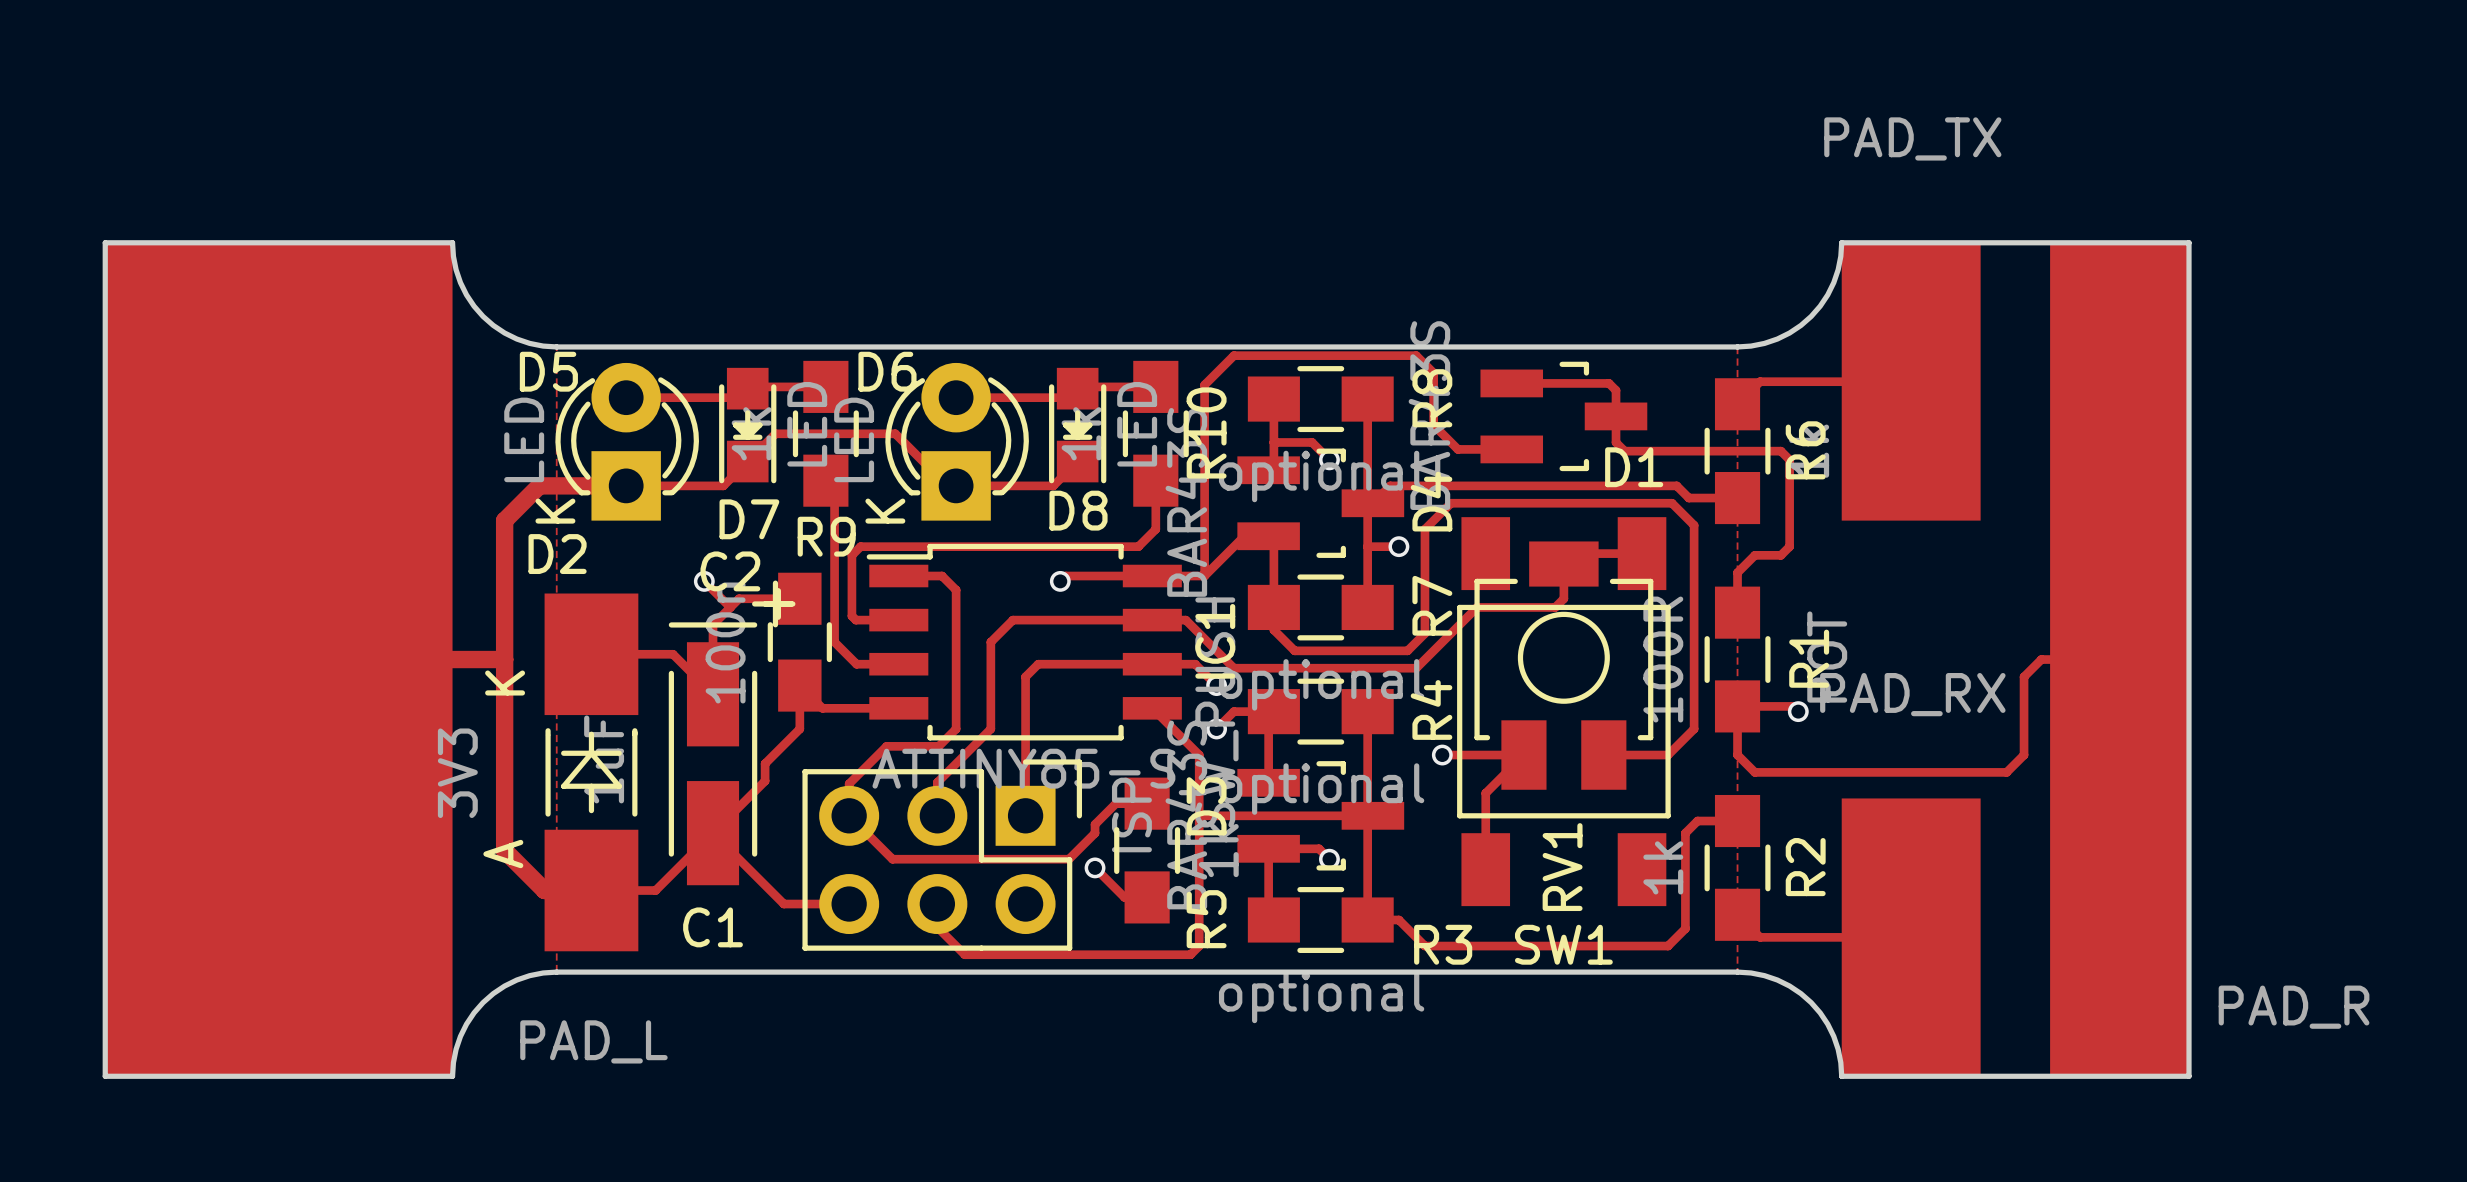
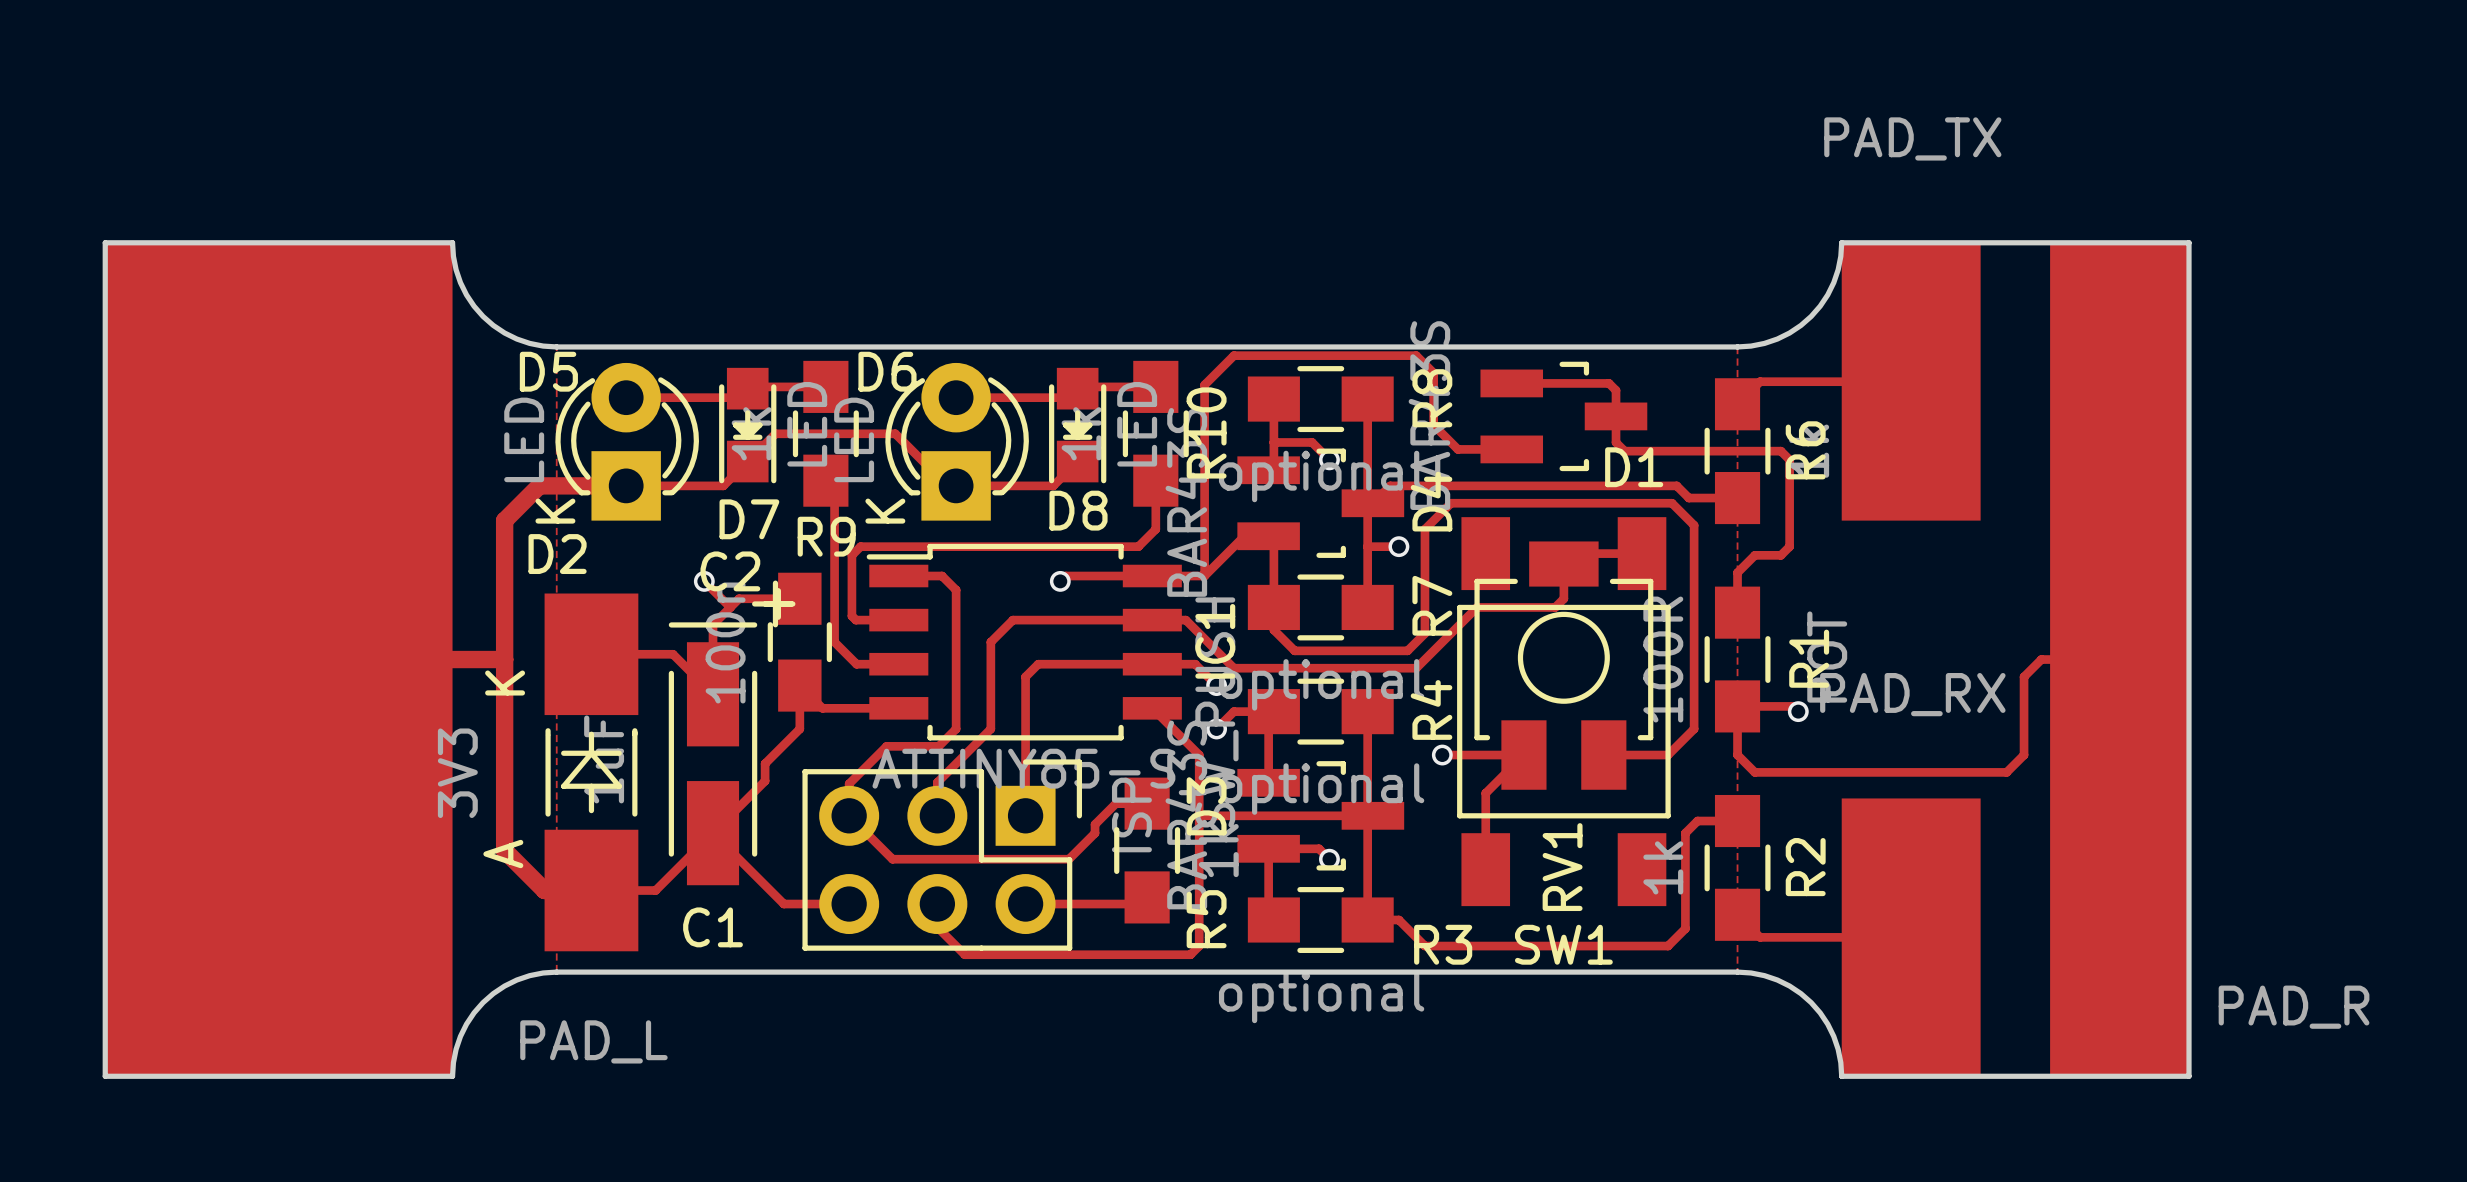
track: (1095, 867) (1124, 897) (1147, 897) -> none
via: (1095, 867) -> none
track: none -> (1025, 904) (1140, 904)

